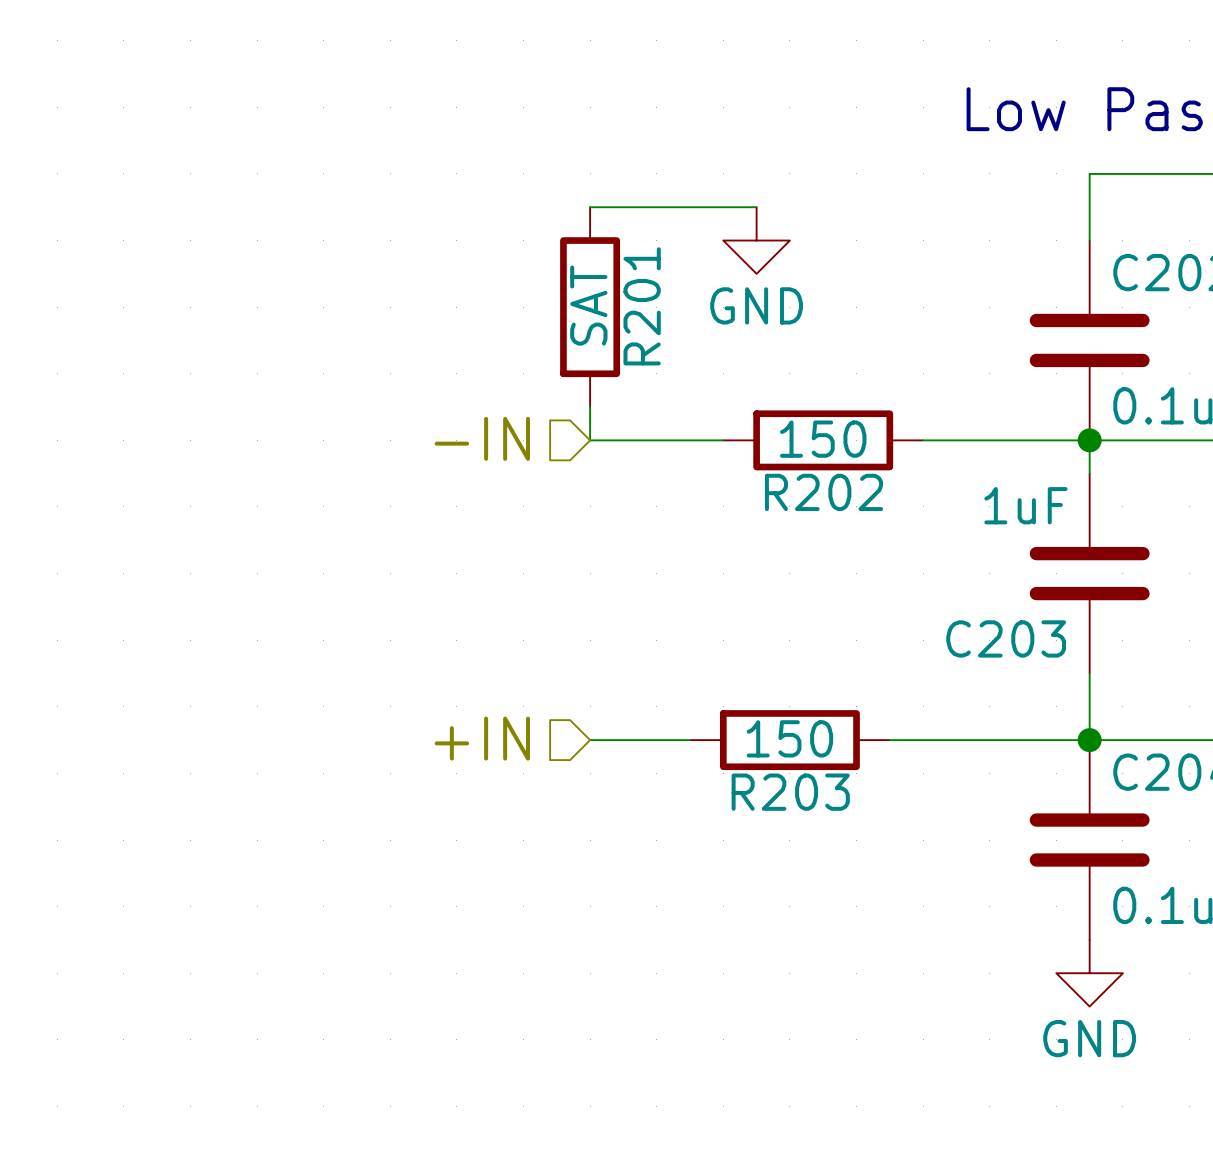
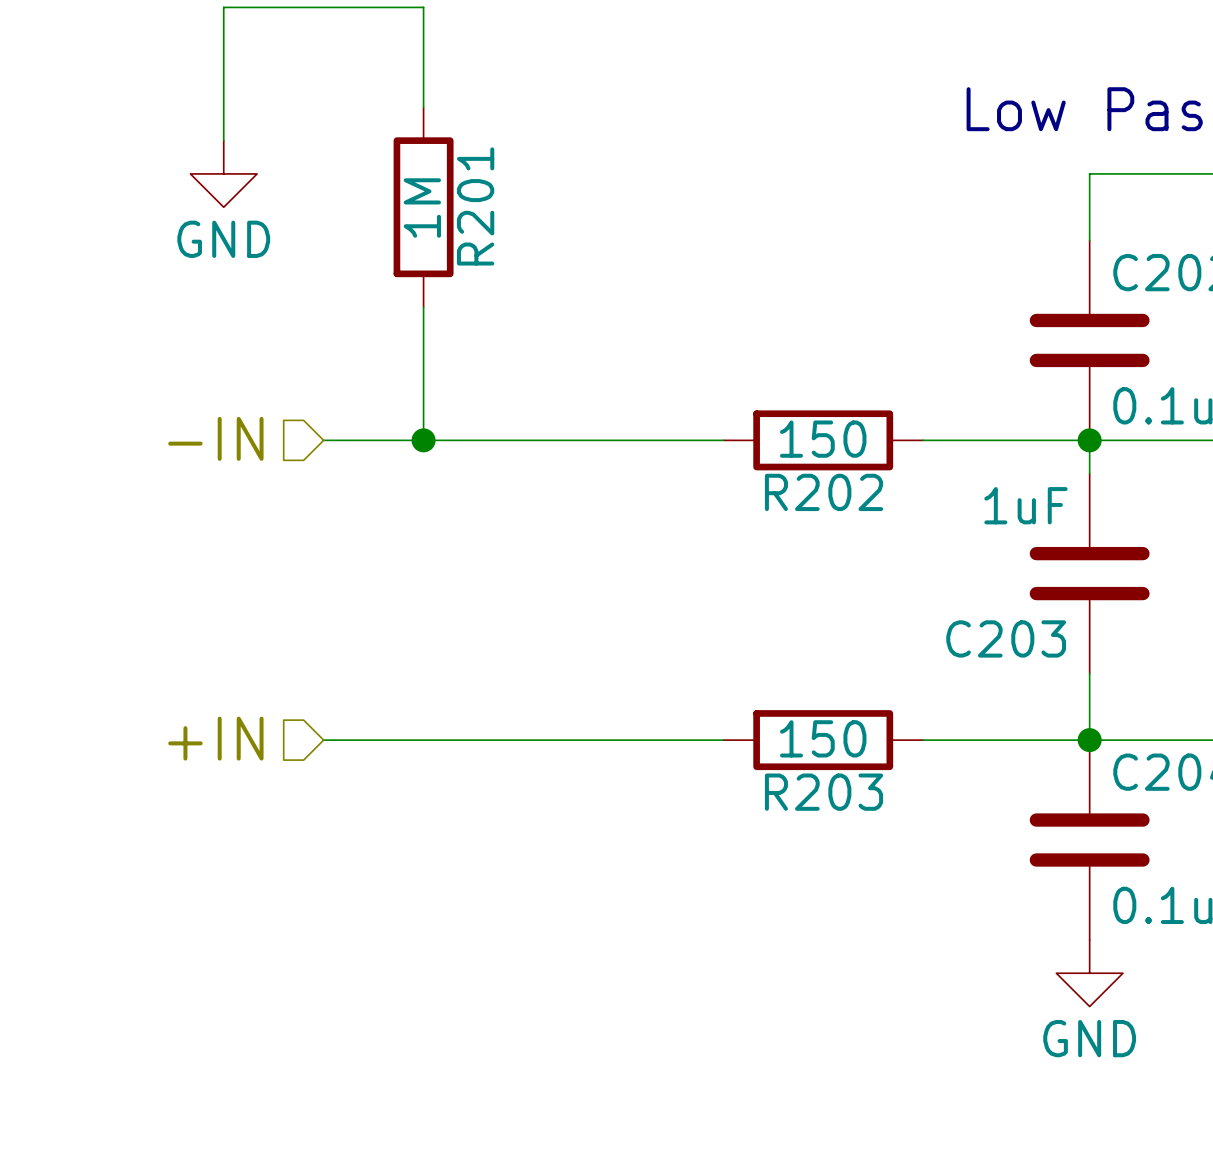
wire: none -> (423, 107) (423, 7) (223, 7) (223, 140)
wire: (590, 207) (756, 207) -> none
power symbol position: GND (756, 240) -> GND (223, 173)
R201 value: SAT (588, 305) -> 1M (422, 208)
wire: none -> (423, 307) (423, 440)
R201 position: (590, 307) -> (423, 207)
wire: (590, 407) (590, 440) -> (323, 440) (590, 440)
hierarchical label position: -IN (482, 438) -> -IN (215, 438)
junction: none -> (423, 440)
hierarchical label position: +IN (482, 738) -> +IN (215, 738)
wire: none -> (323, 740) (590, 740)
R203 position: (789, 740) -> (823, 740)

